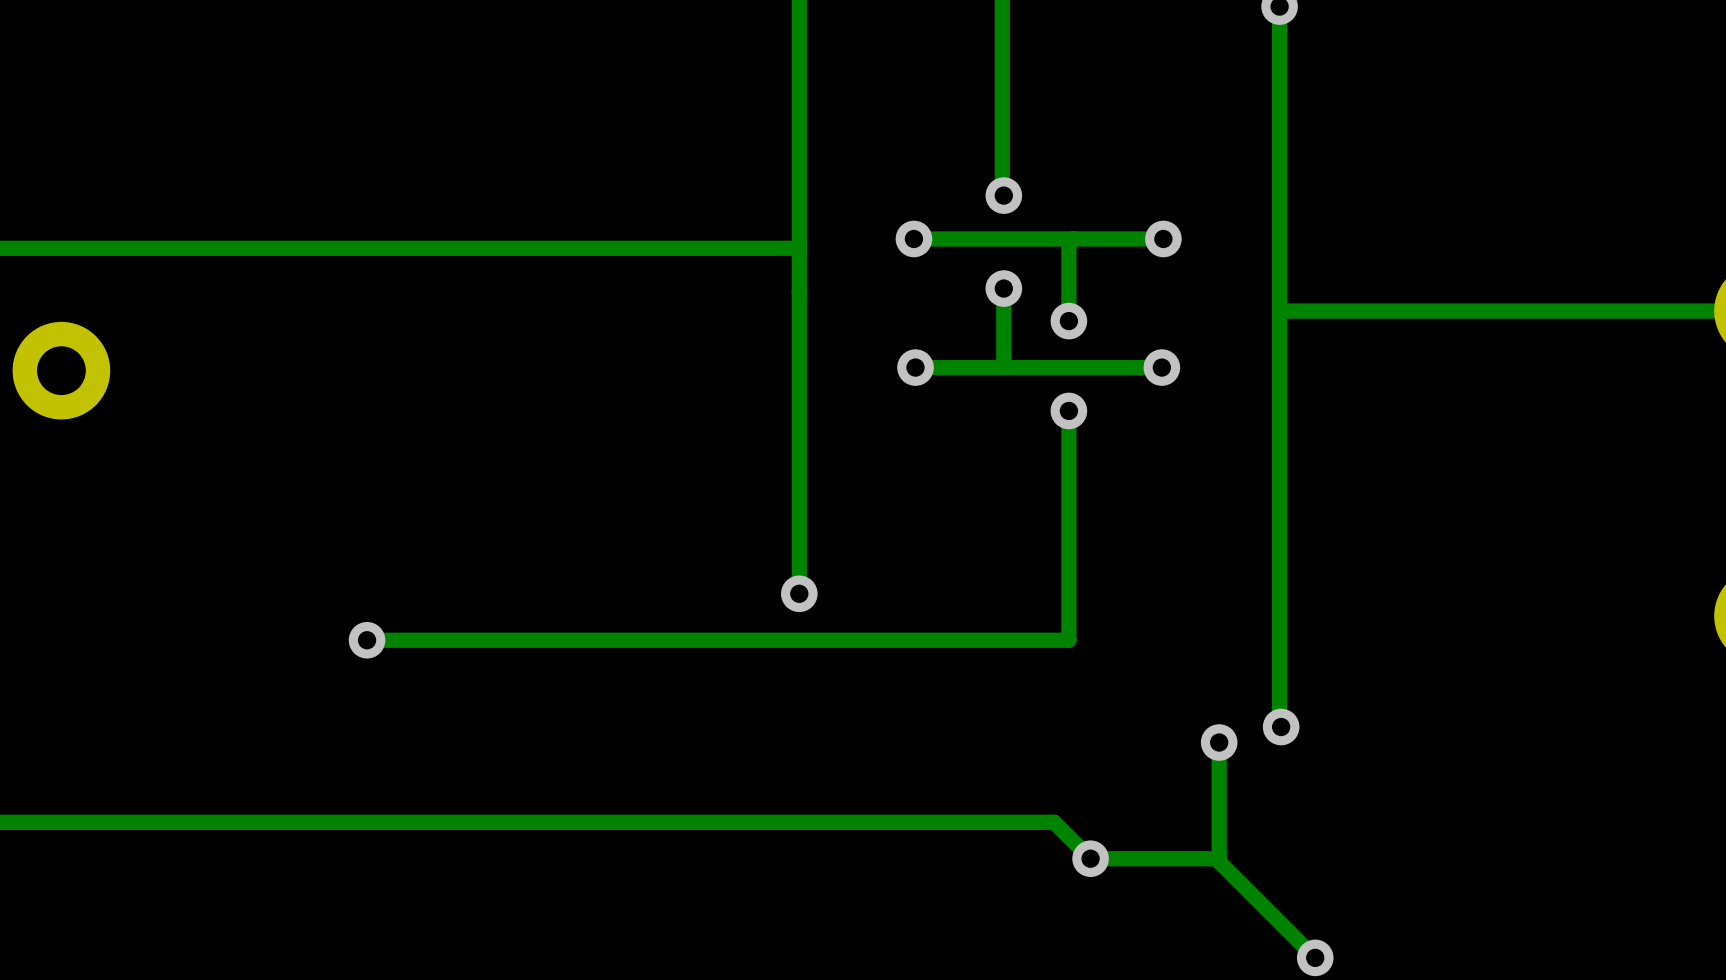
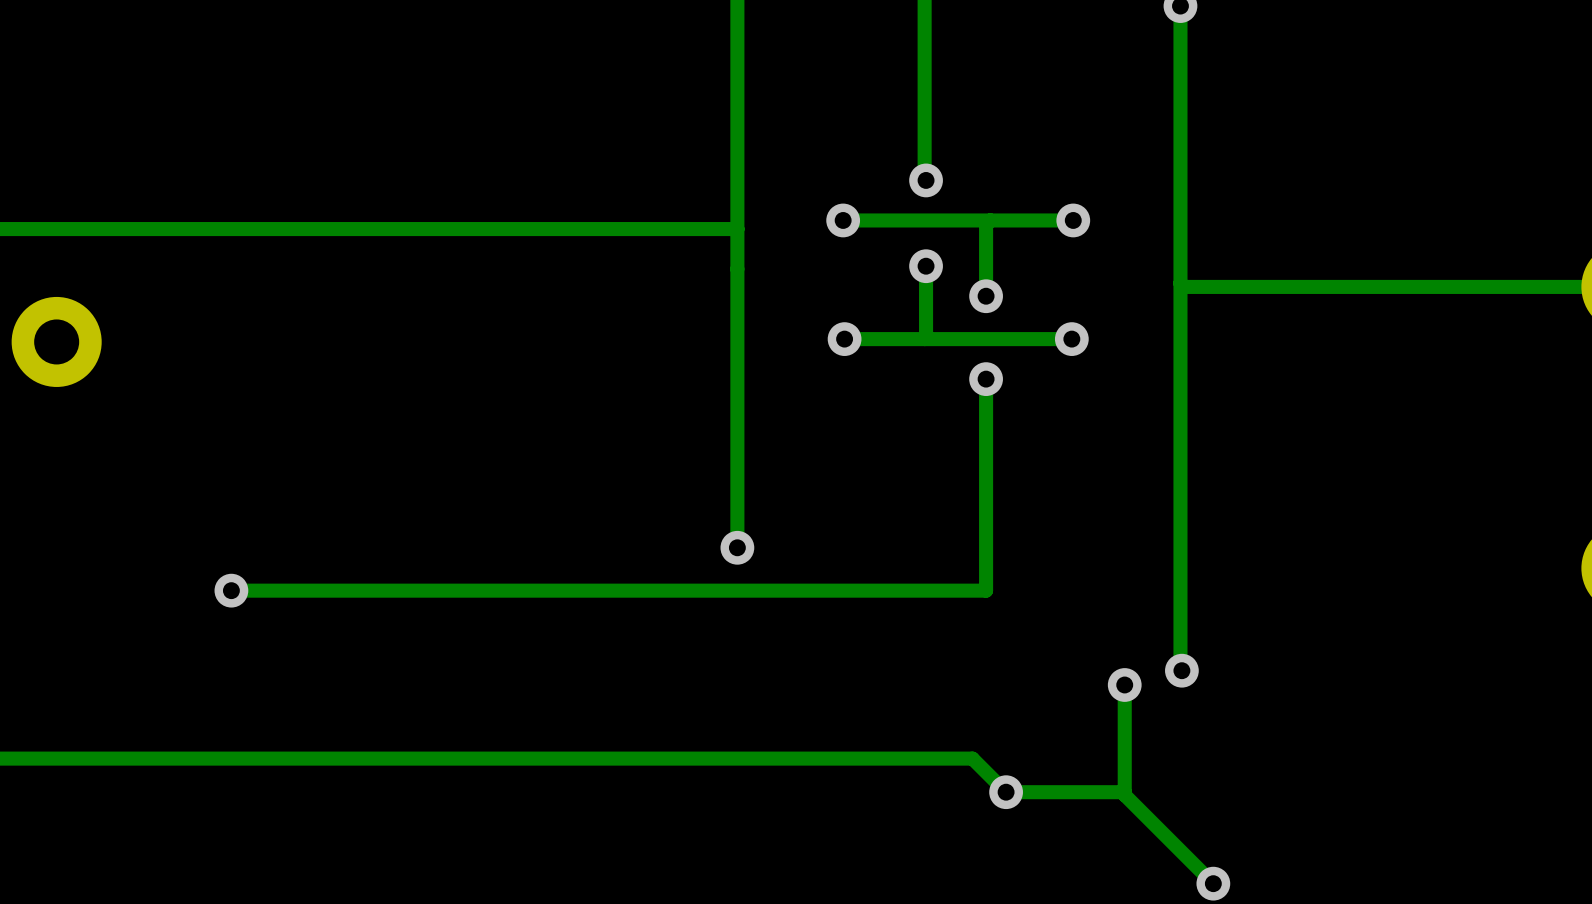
track: none -> (338, 590) (231, 590)
via position: (367, 640) -> (231, 590)

